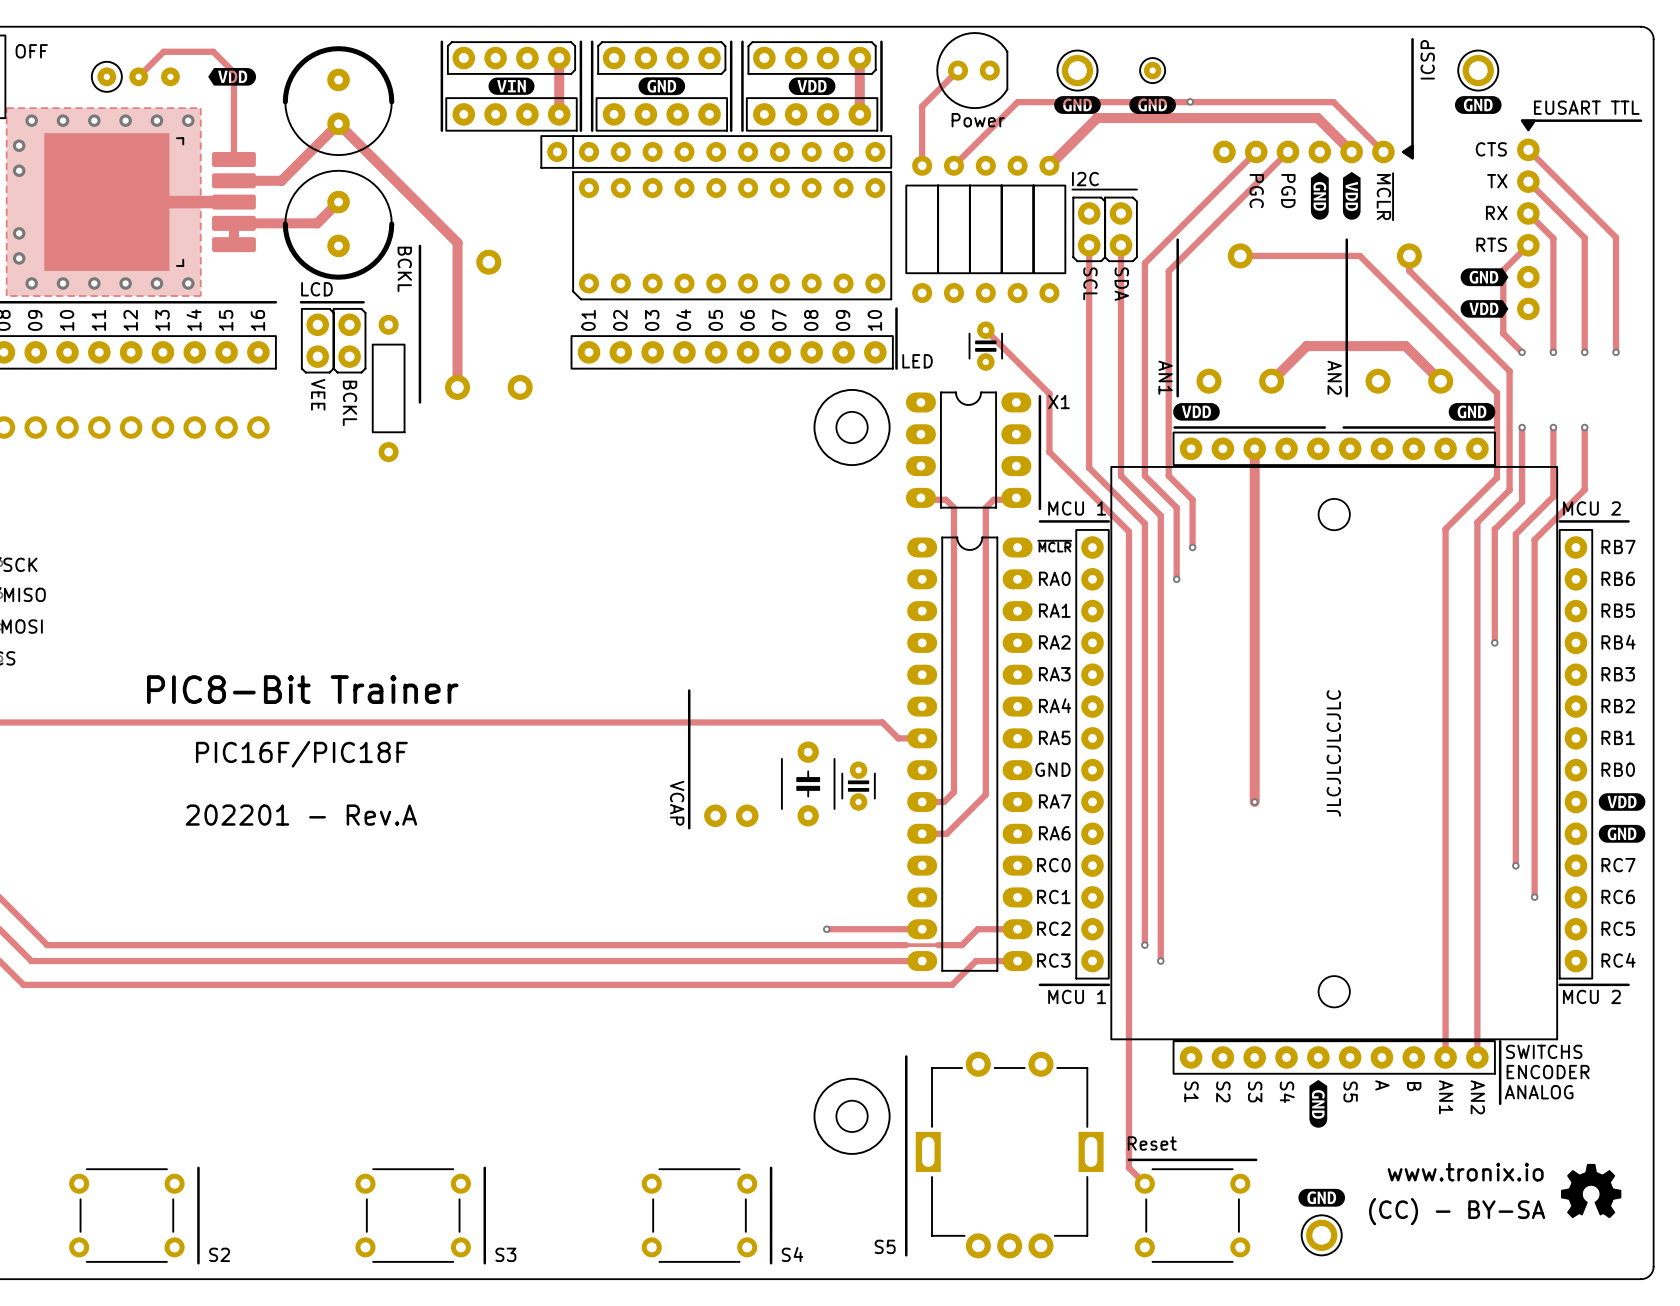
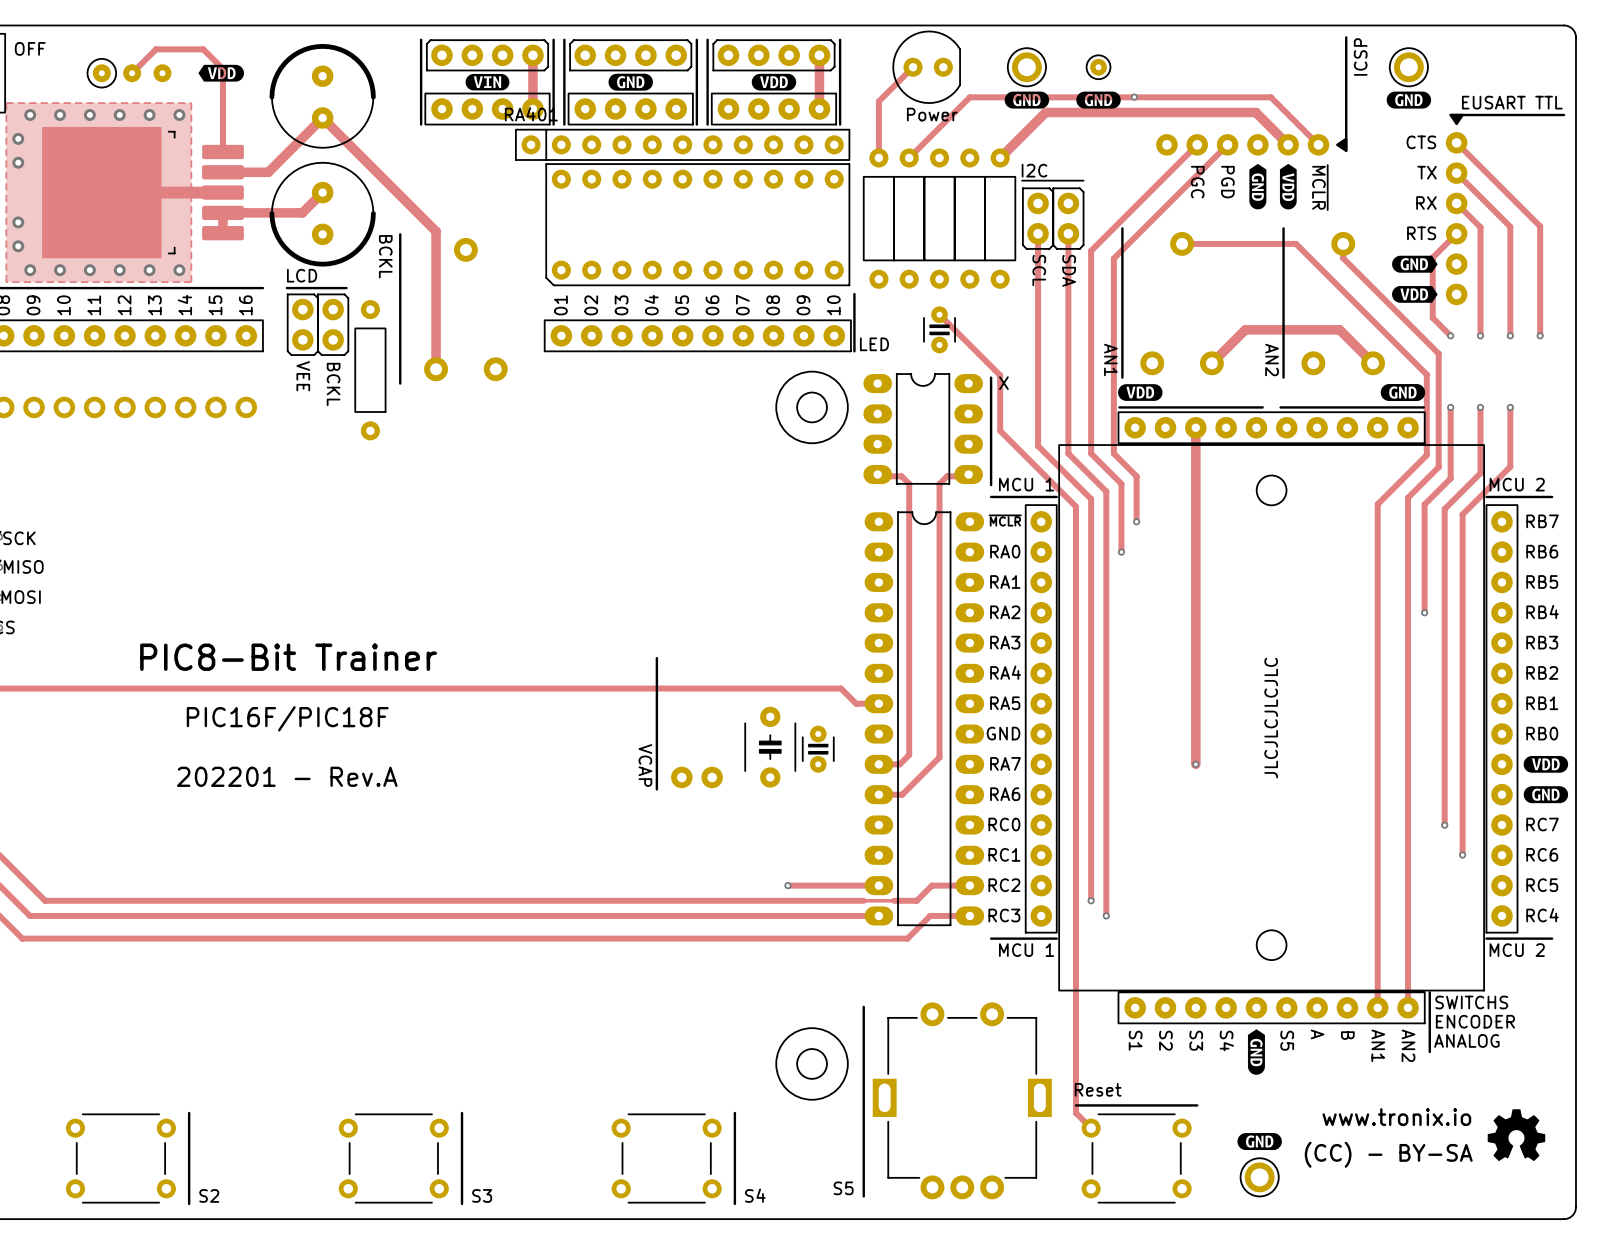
RA401 name: none -> RA401 (531, 114)
text: X1 (1059, 401) -> X (1003, 383)

